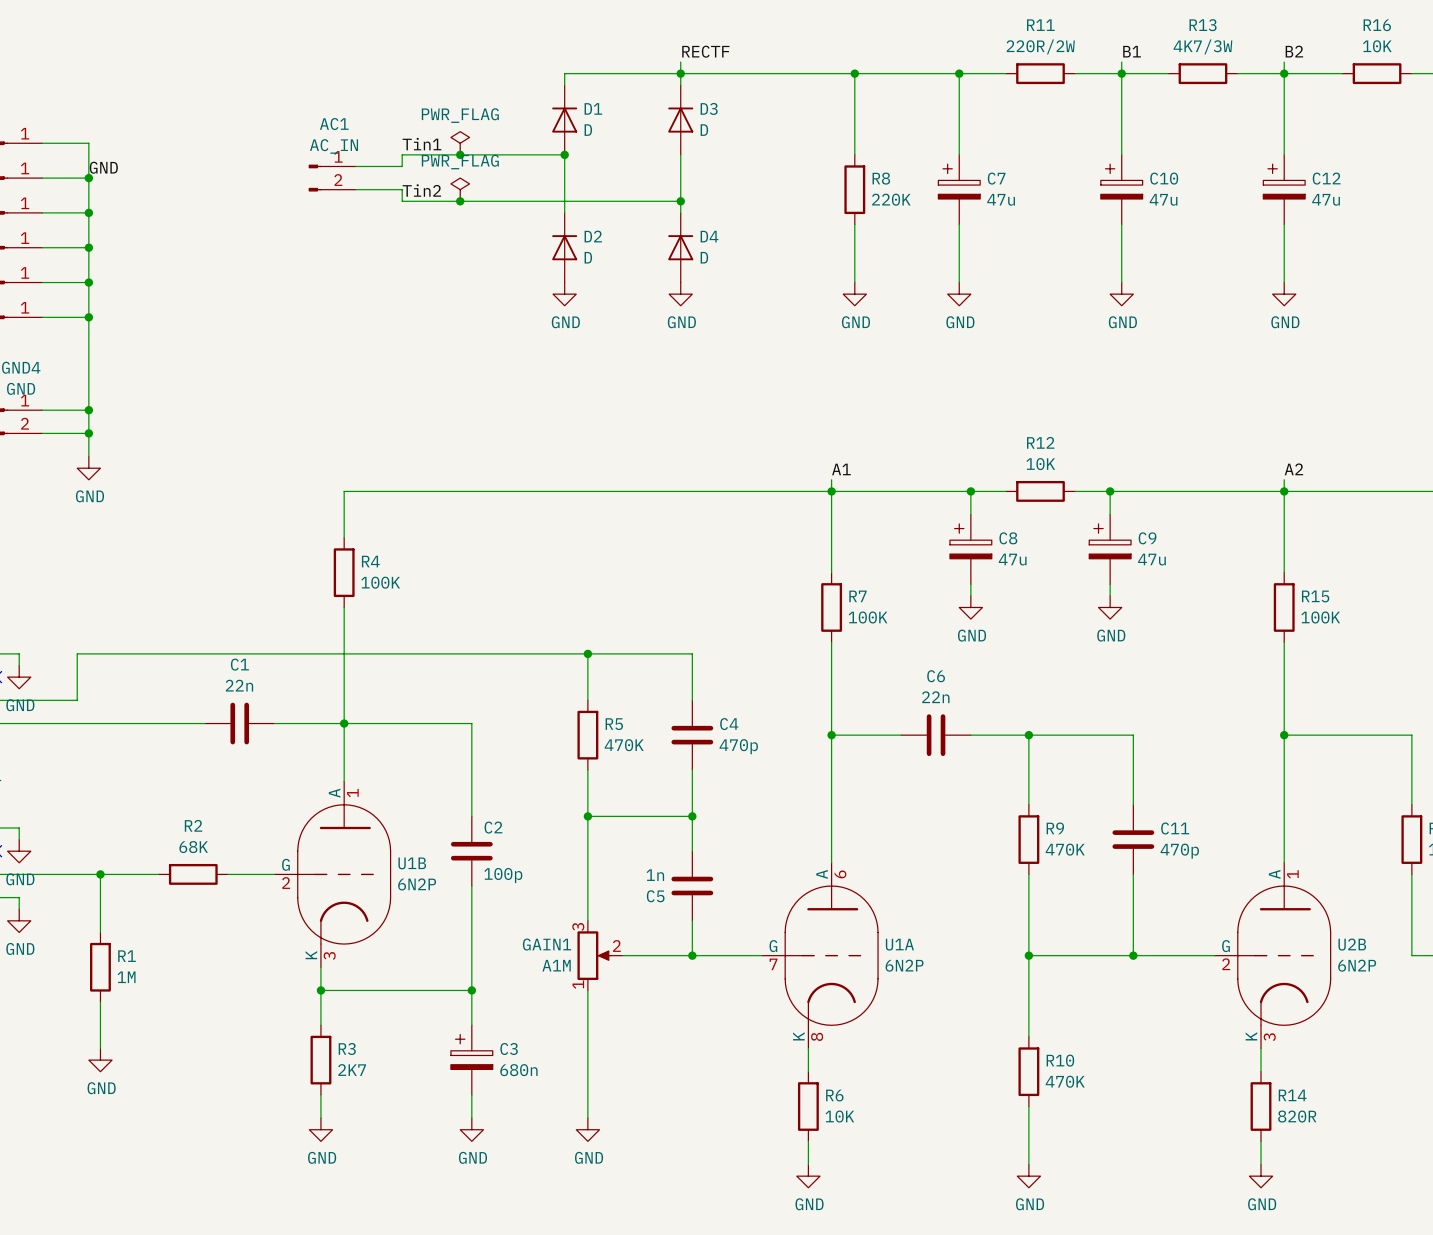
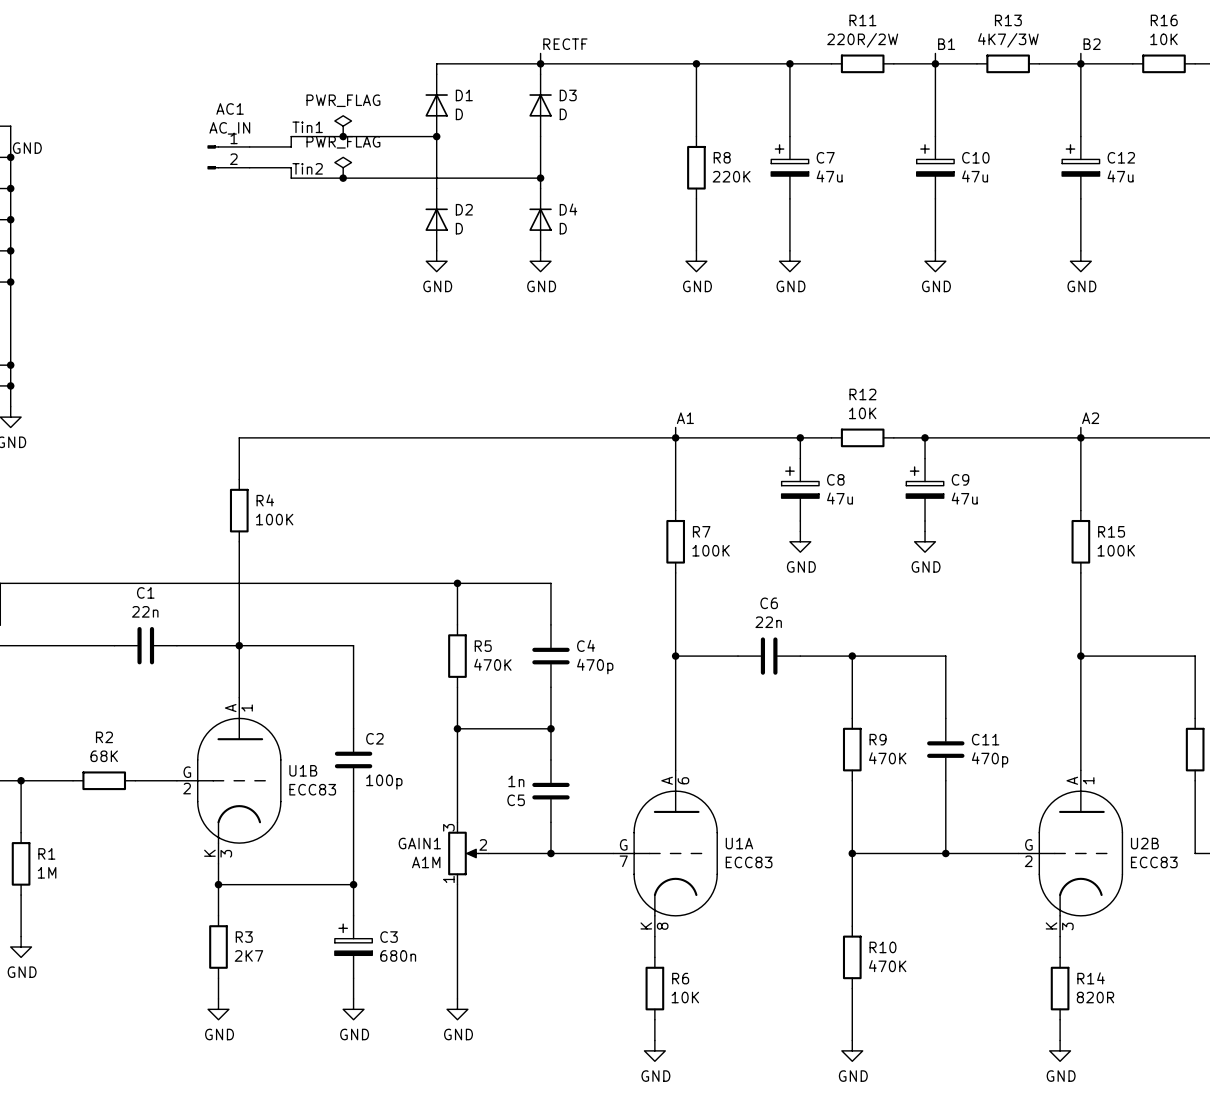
U1B value: 6N2P (417, 884) -> ECC83 (312, 789)
U1A value: 6N2P (904, 965) -> ECC83 (749, 862)
U2B value: 6N2P (1357, 965) -> ECC83 (1154, 862)

